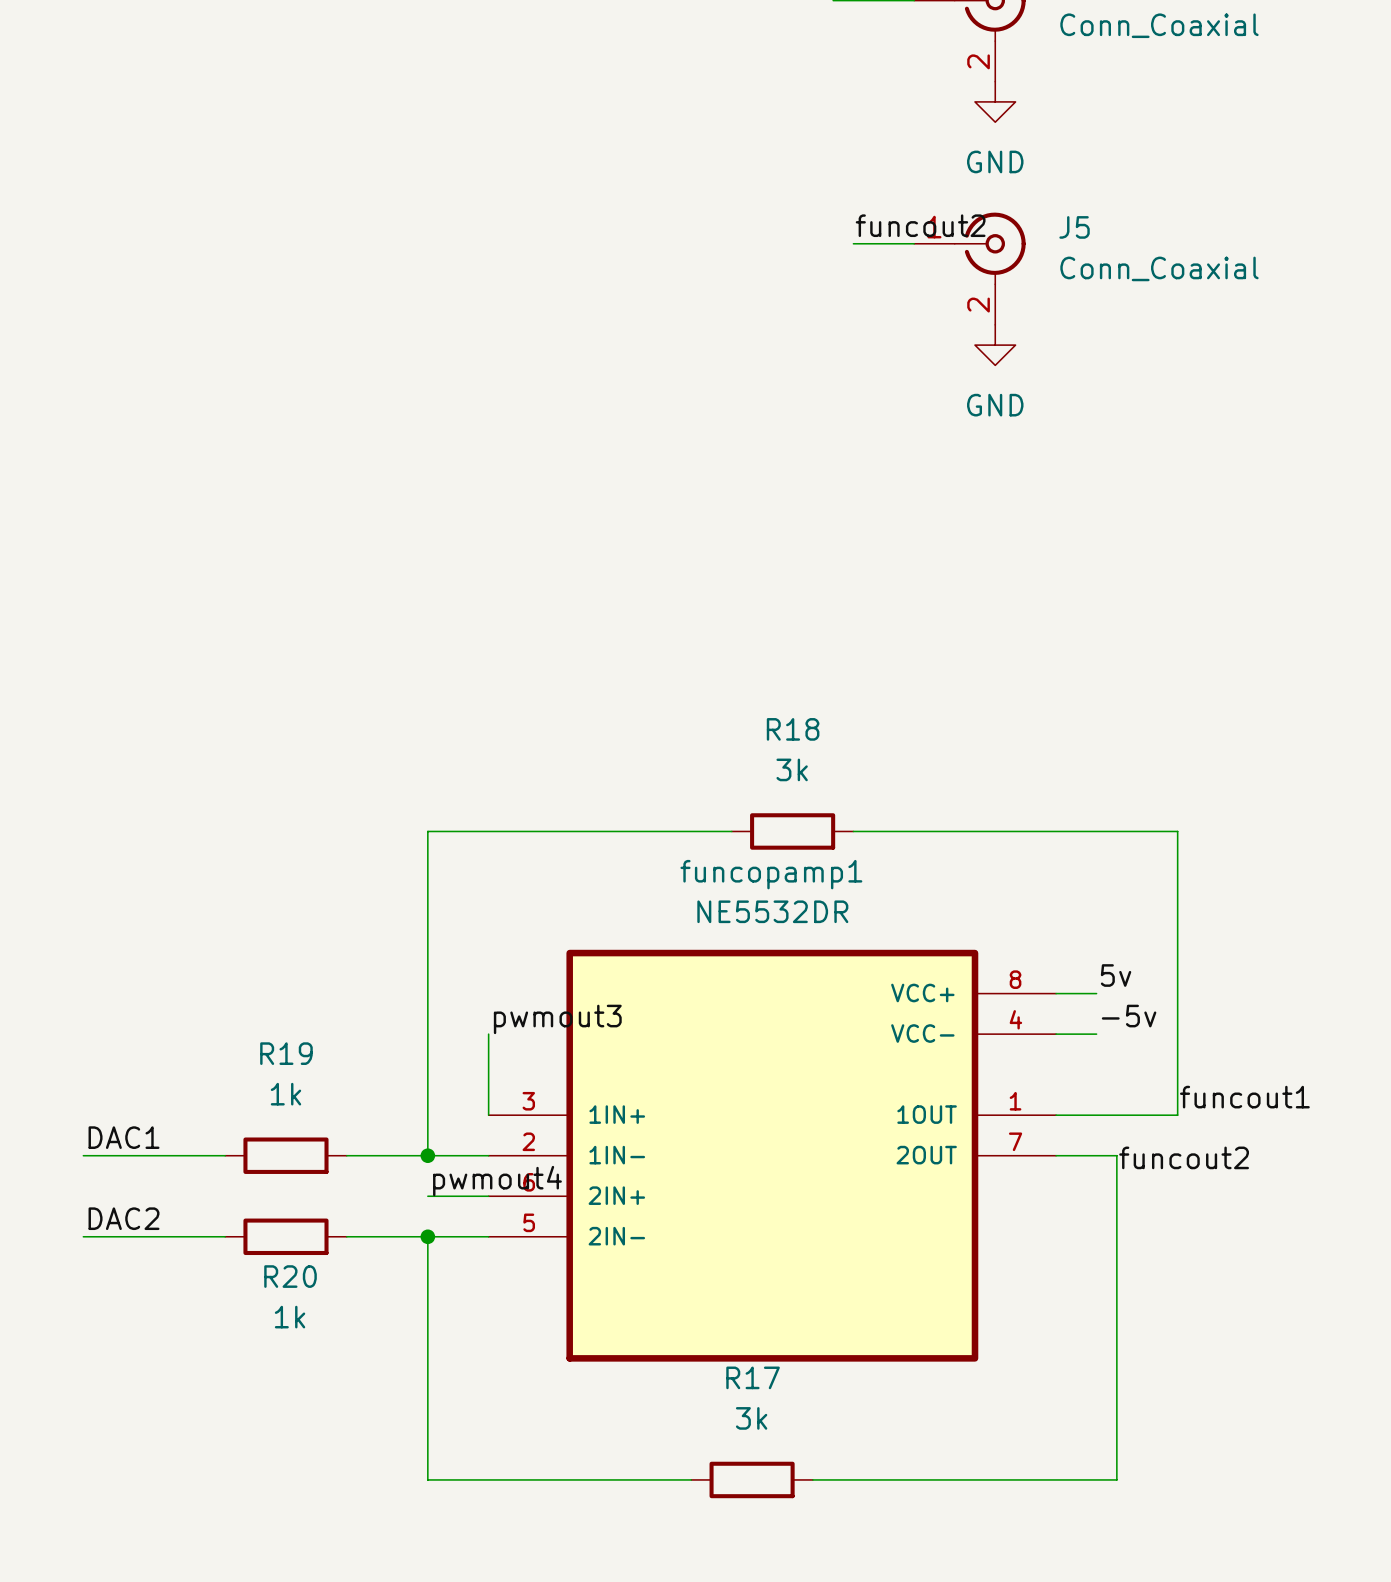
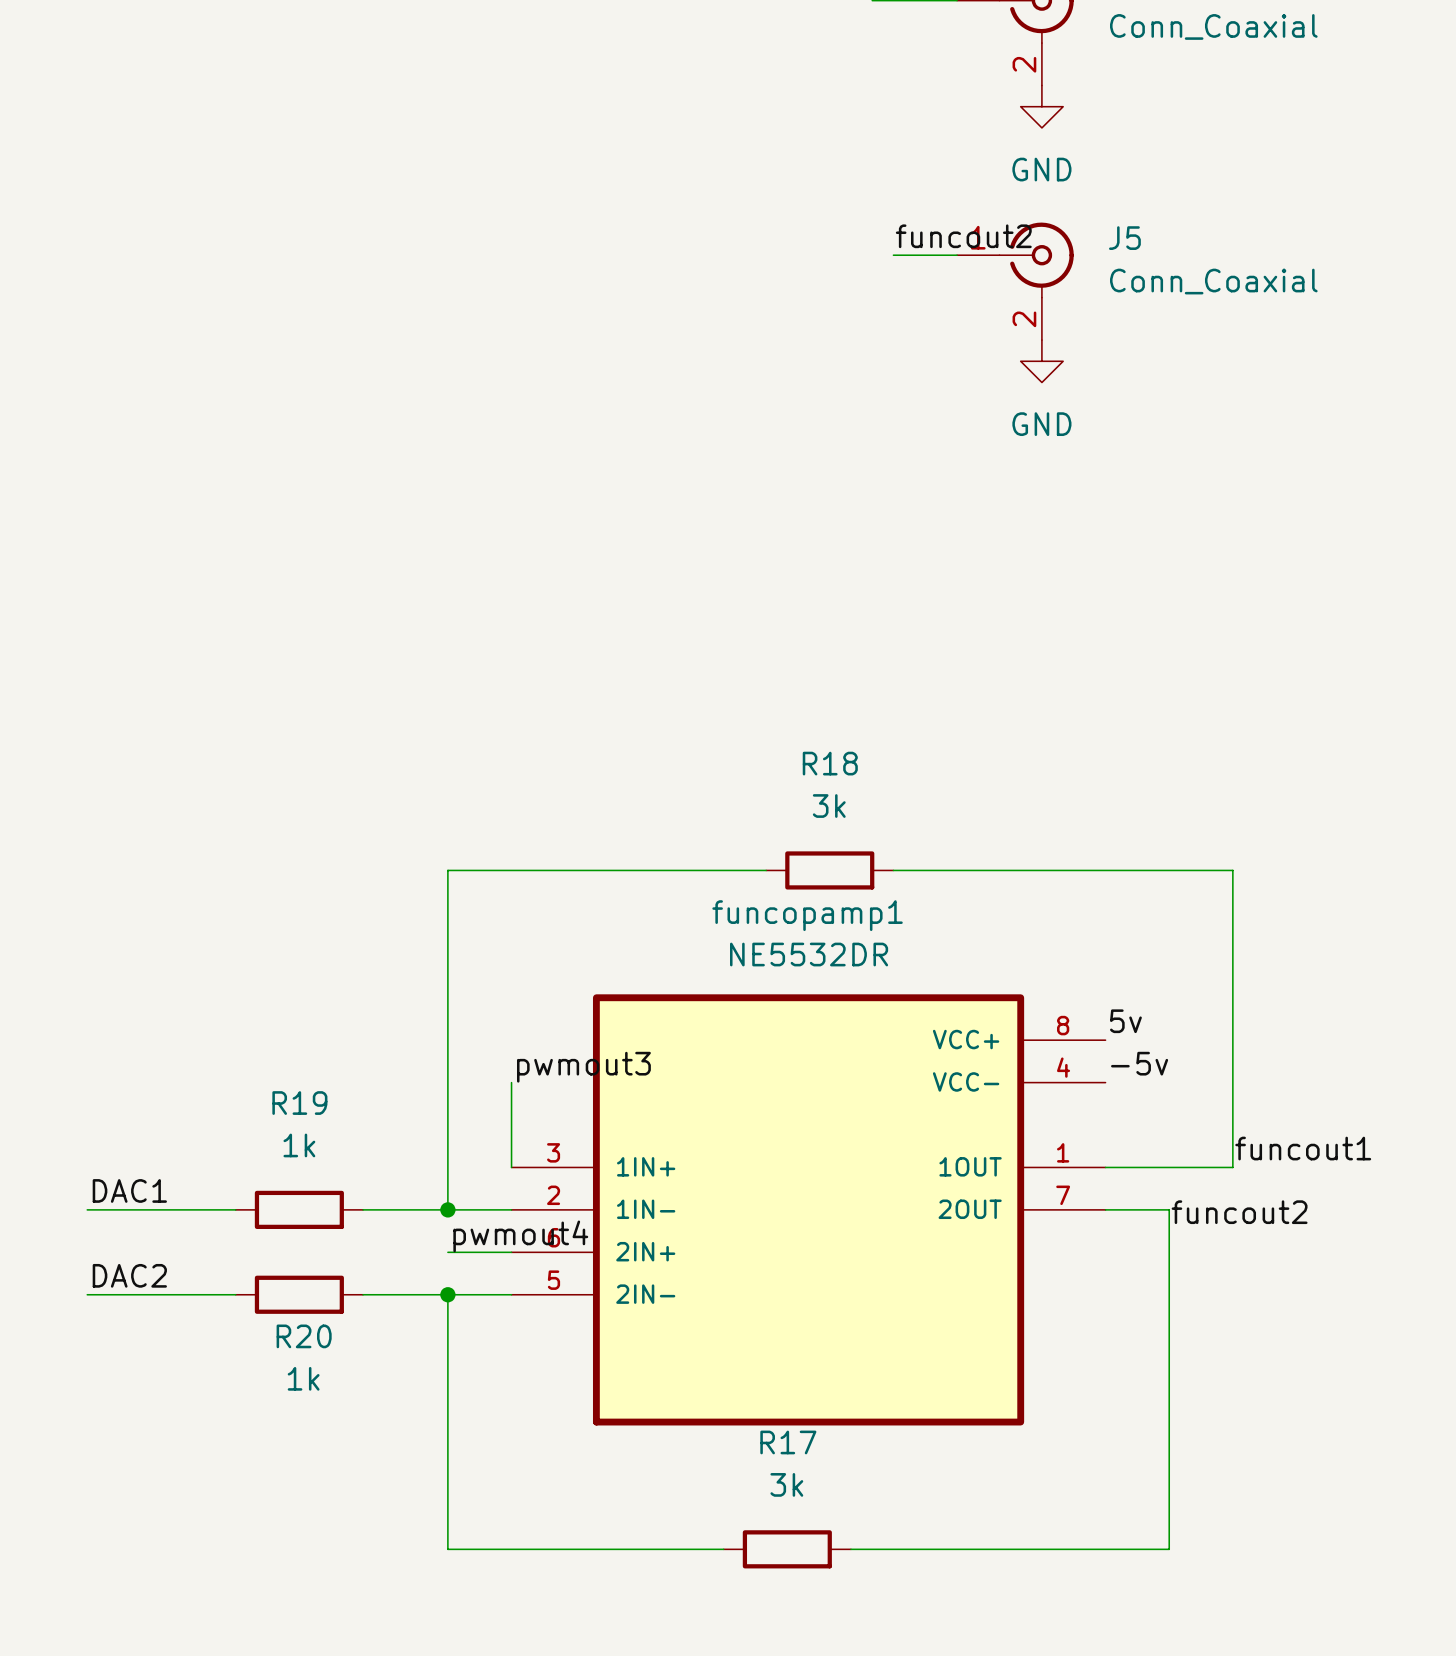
label position: 5v (1116, 975) -> 5v (1125, 1021)
wire: (1056, 993) (1096, 993) -> none
label position: -5v (1129, 1016) -> -5v (1139, 1063)
wire: (1056, 1034) (1096, 1034) -> none

